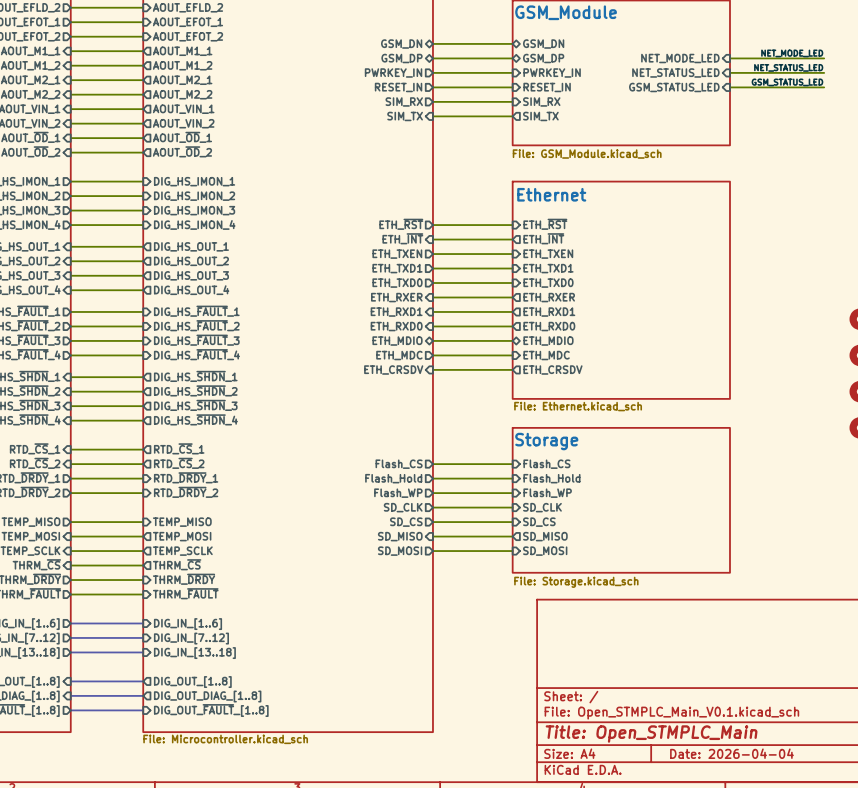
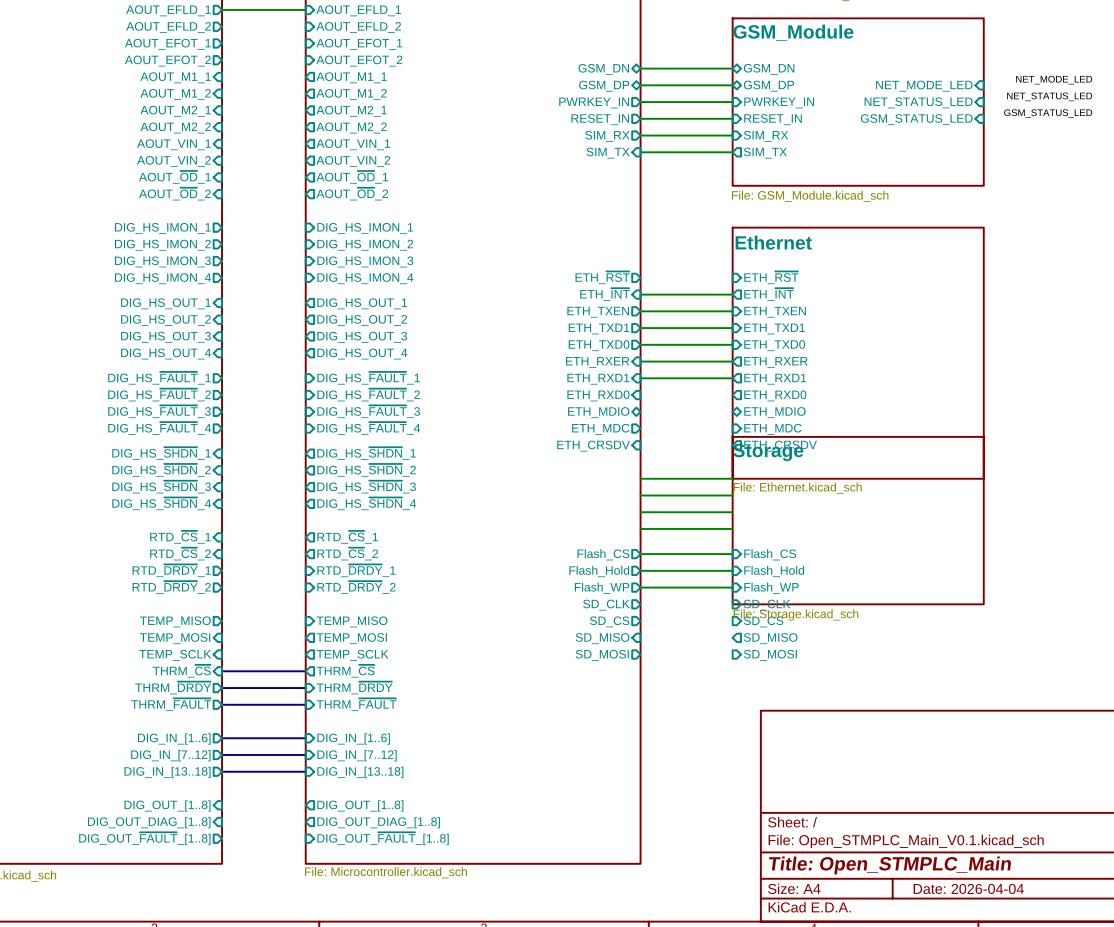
wire: (70, 7) (143, 7) -> none
wire: (70, 22) (143, 22) -> none
wire: (70, 36) (143, 36) -> none
wire: (70, 51) (143, 51) -> none
wire: (729, 58) (824, 58) -> none
wire: (70, 65) (143, 65) -> none
wire: (729, 72) (824, 72) -> none
wire: (70, 80) (143, 80) -> none
wire: (729, 87) (824, 87) -> none
wire: (70, 94) (143, 94) -> none
wire: (70, 109) (143, 109) -> none
wire: (70, 123) (143, 123) -> none
wire: (70, 138) (143, 138) -> none
wire: (70, 152) (143, 152) -> none
wire: (70, 181) (143, 181) -> none
wire: (70, 196) (143, 196) -> none
wire: (70, 210) (143, 210) -> none
wire: (70, 225) (143, 225) -> none
wire: (432, 225) (512, 225) -> none
wire: (70, 246) (143, 246) -> none
wire: (70, 261) (143, 261) -> none
wire: (70, 275) (143, 275) -> none
wire: (70, 290) (143, 290) -> none
wire: (70, 311) (143, 311) -> none
wire: (70, 326) (143, 326) -> none
wire: (432, 326) (512, 326) -> (640, 478) (732, 478)
wire: (70, 340) (143, 340) -> none
wire: (432, 340) (512, 340) -> (640, 495) (732, 495)
wire: (70, 355) (143, 355) -> none
wire: (432, 355) (512, 355) -> (640, 512) (732, 512)
wire: (432, 369) (512, 369) -> none
wire: (70, 377) (143, 377) -> none
wire: (70, 391) (143, 391) -> none
wire: (70, 406) (143, 406) -> none
wire: (70, 420) (143, 420) -> none
wire: (70, 449) (143, 449) -> none
wire: (70, 464) (143, 464) -> none
wire: (70, 478) (143, 478) -> none
wire: (70, 493) (143, 493) -> none
sheet Storage position: (621, 500) -> (858, 520)
wire: (432, 507) (512, 507) -> (640, 528) (732, 528)
wire: (70, 522) (143, 522) -> none
wire: (432, 522) (512, 522) -> none
wire: (70, 536) (143, 536) -> none
wire: (432, 536) (512, 536) -> none
wire: (70, 551) (143, 551) -> none
wire: (432, 551) (512, 551) -> none
bus: (70, 681) (143, 681) -> (222, 671) (305, 671)
bus: (70, 695) (143, 695) -> (222, 688) (305, 688)
bus: (70, 710) (143, 710) -> (222, 704) (305, 704)

